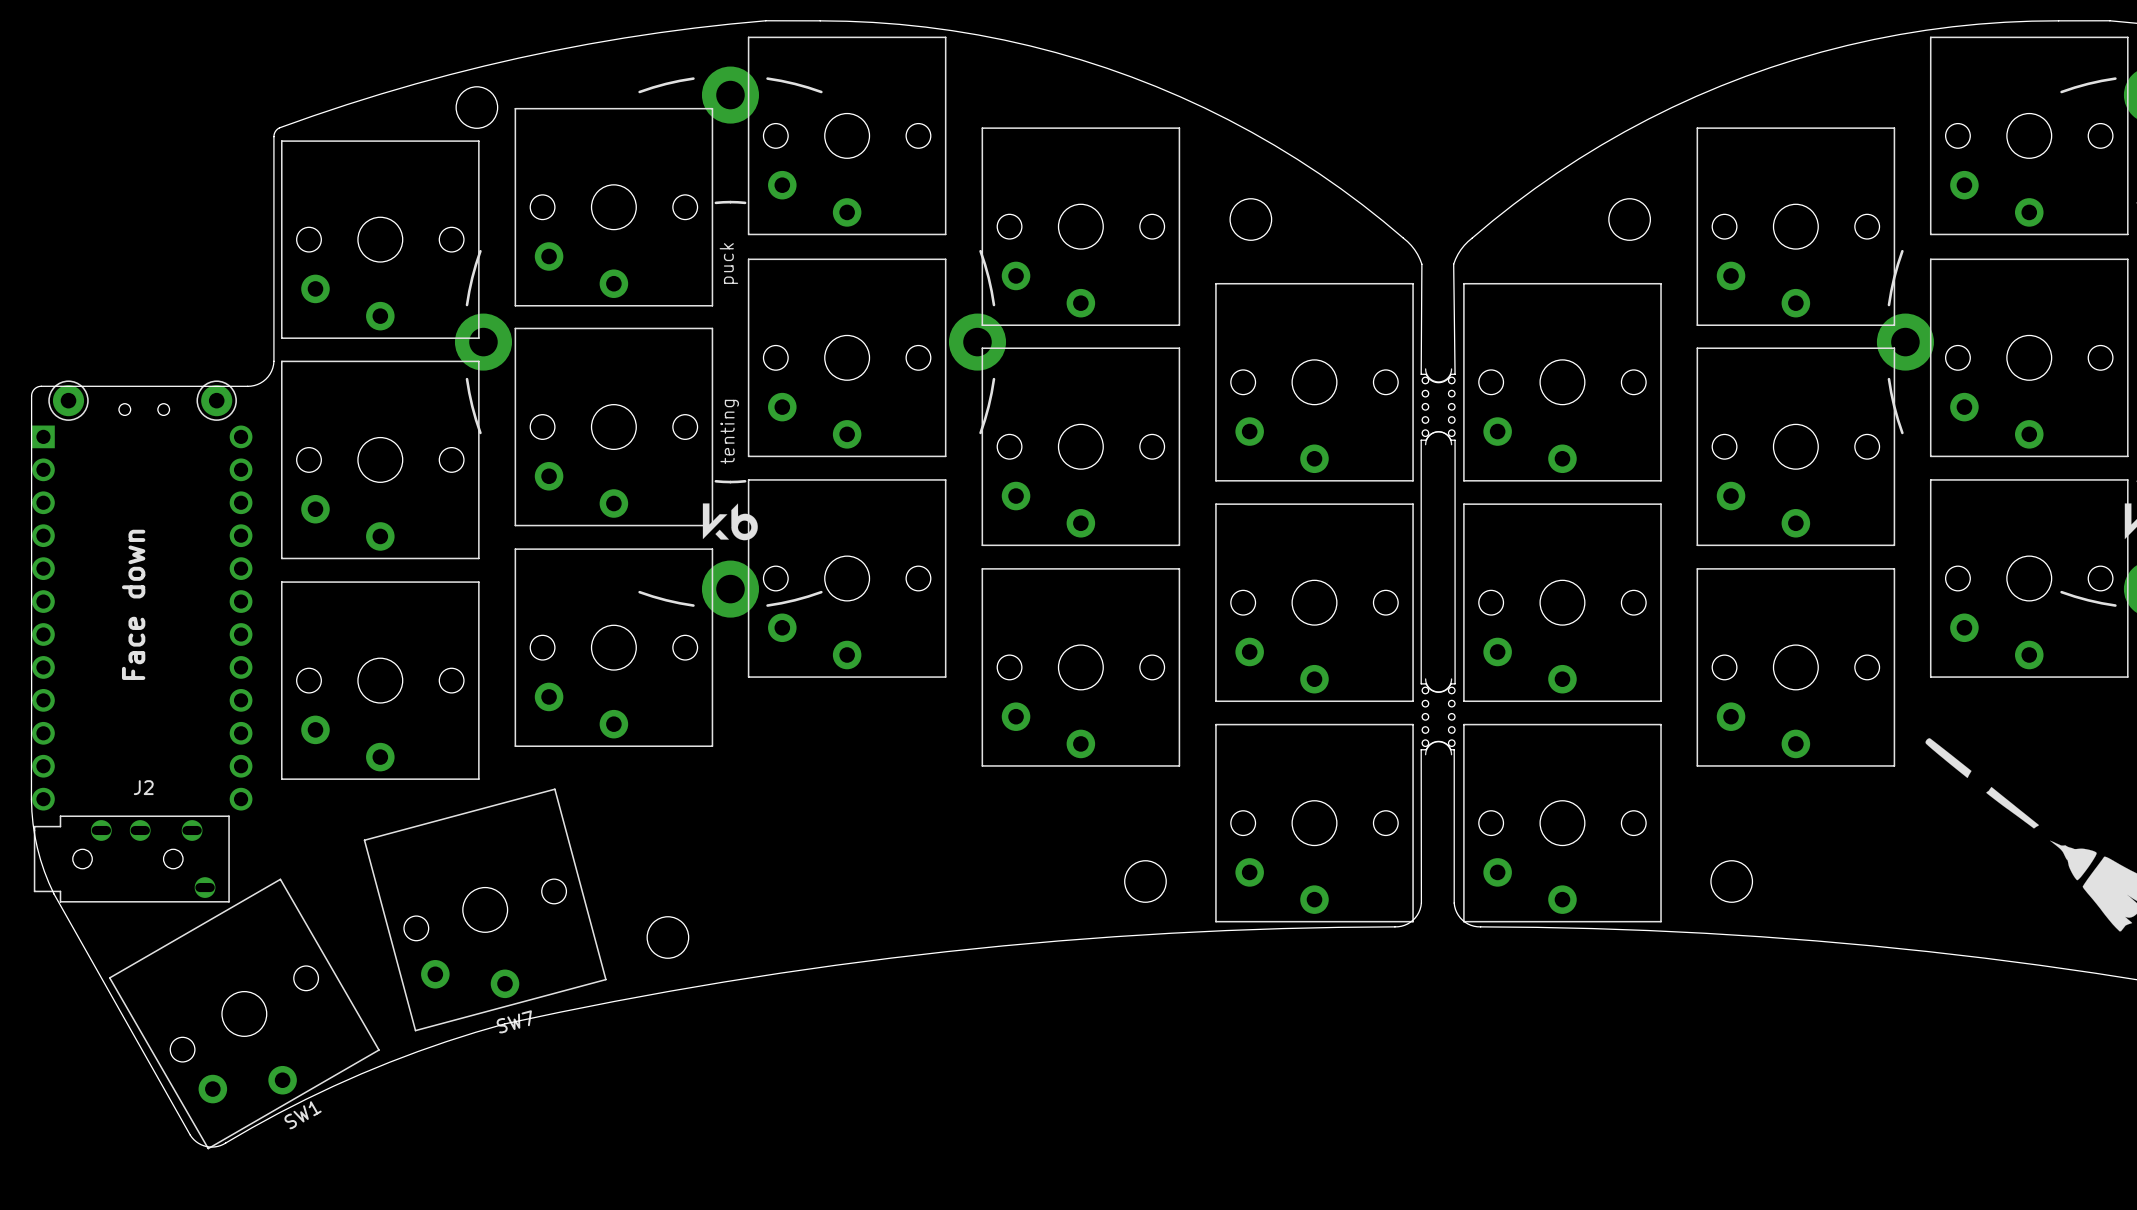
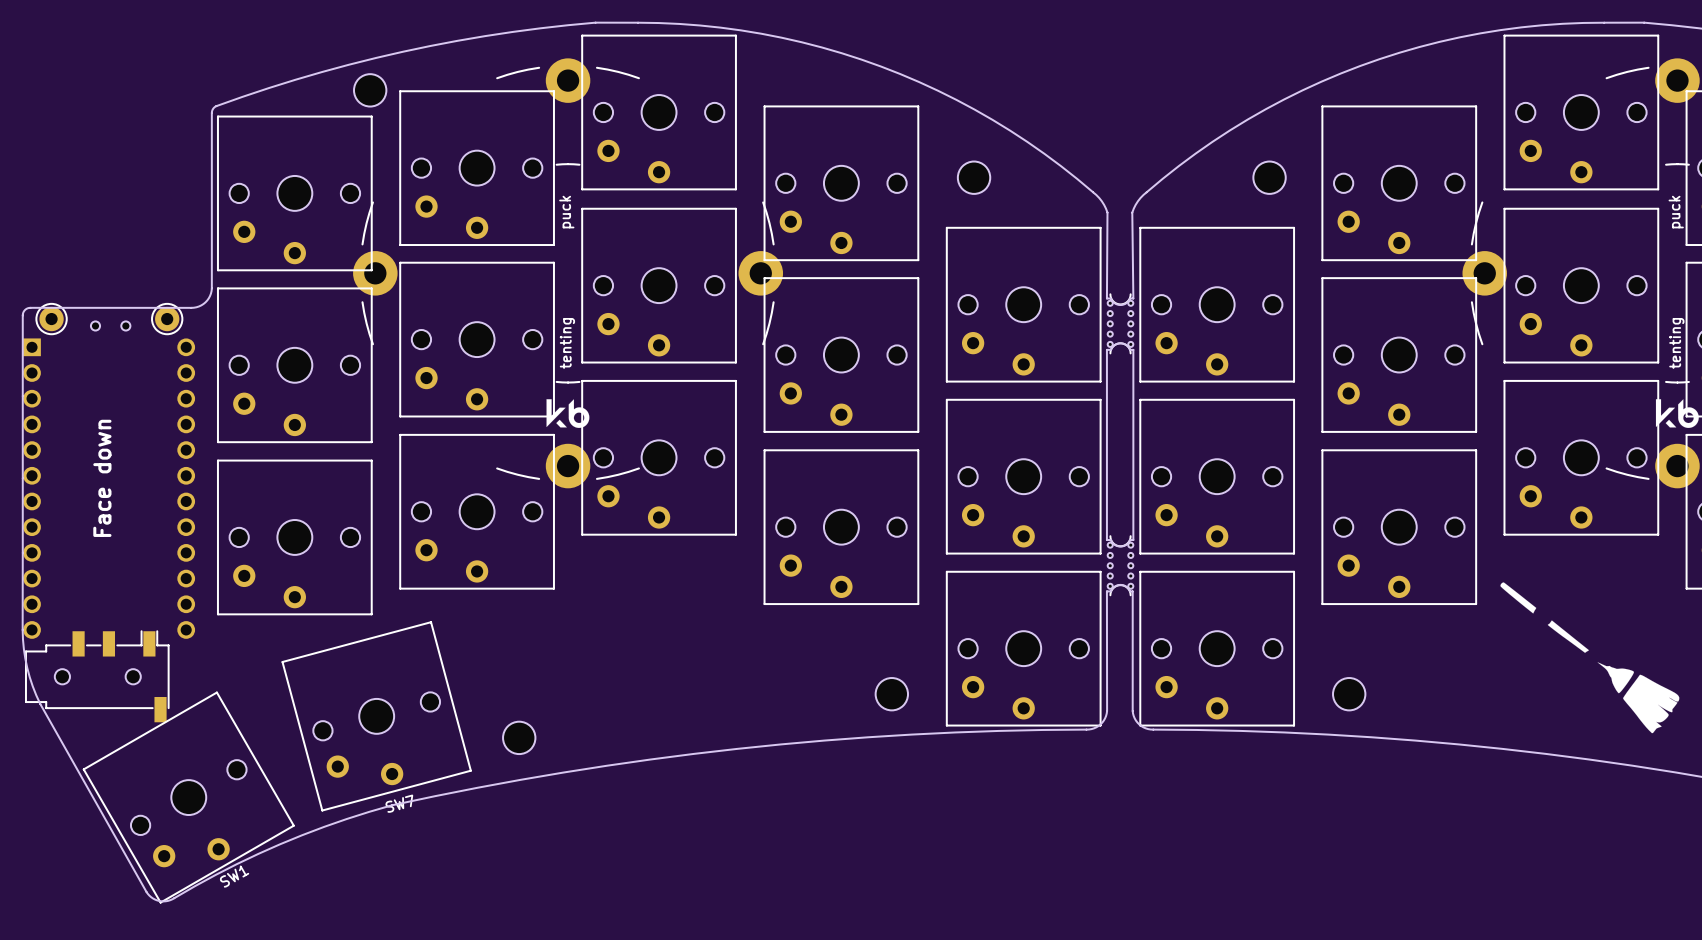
part: none -> (97, 676)
J2: (131, 859) -> none

